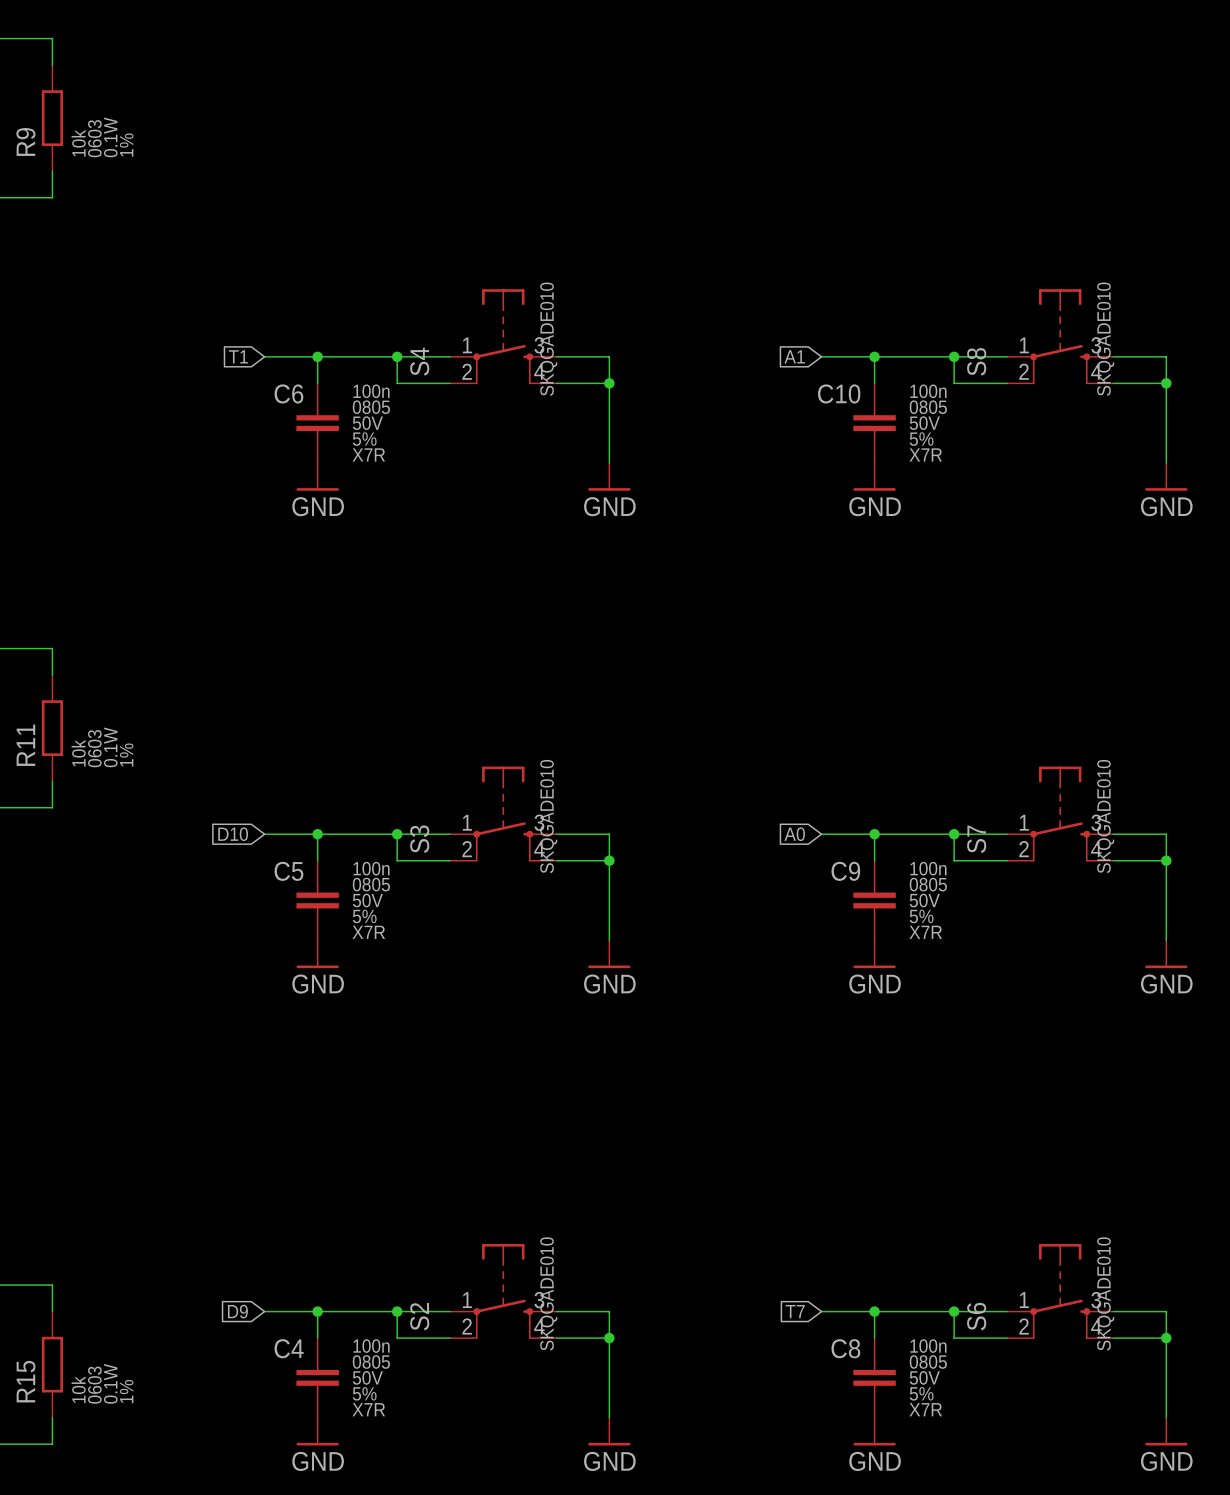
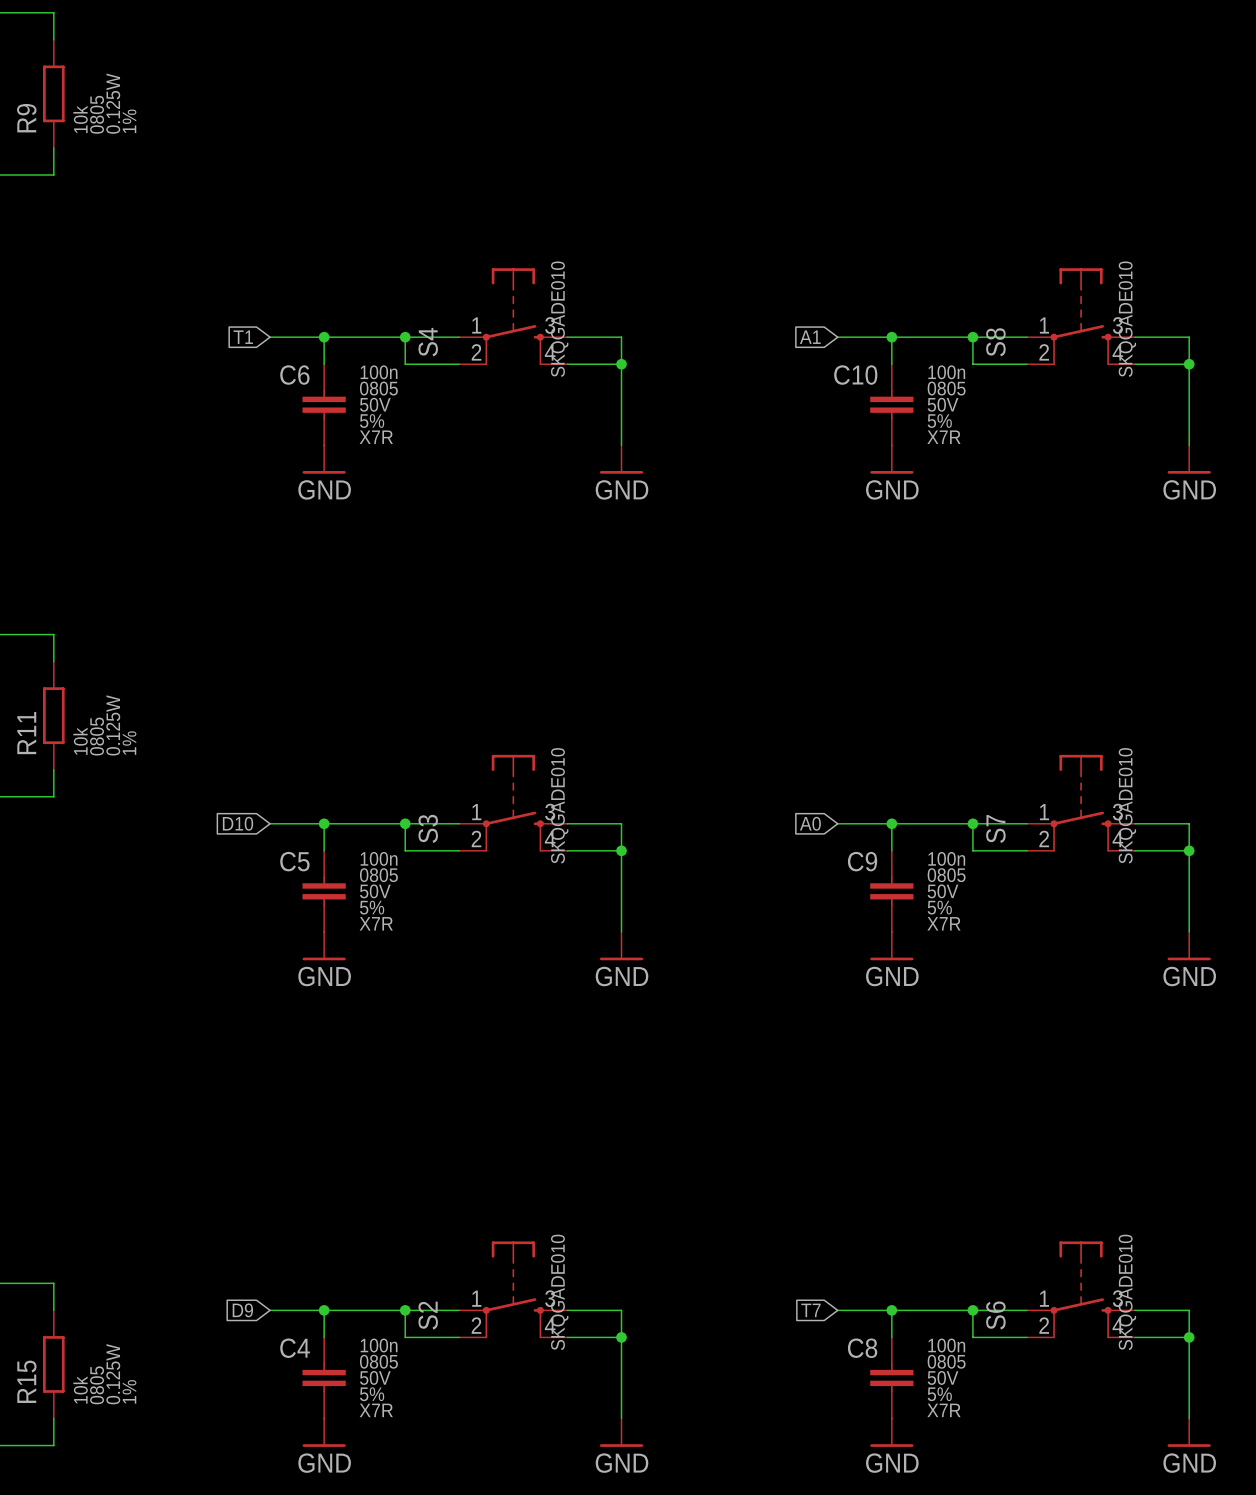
R9 text: 0.1W (110, 137) -> 0.125W (113, 103)
R9 text: 0603 (94, 138) -> 0805 (97, 114)
R11 text: 0.1W (110, 747) -> 0.125W (113, 725)
R11 text: 0603 (94, 748) -> 0805 (97, 736)
R15 text: 0.1W (110, 1383) -> 0.125W (113, 1374)
R15 text: 0603 (94, 1385) -> 0805 (97, 1385)

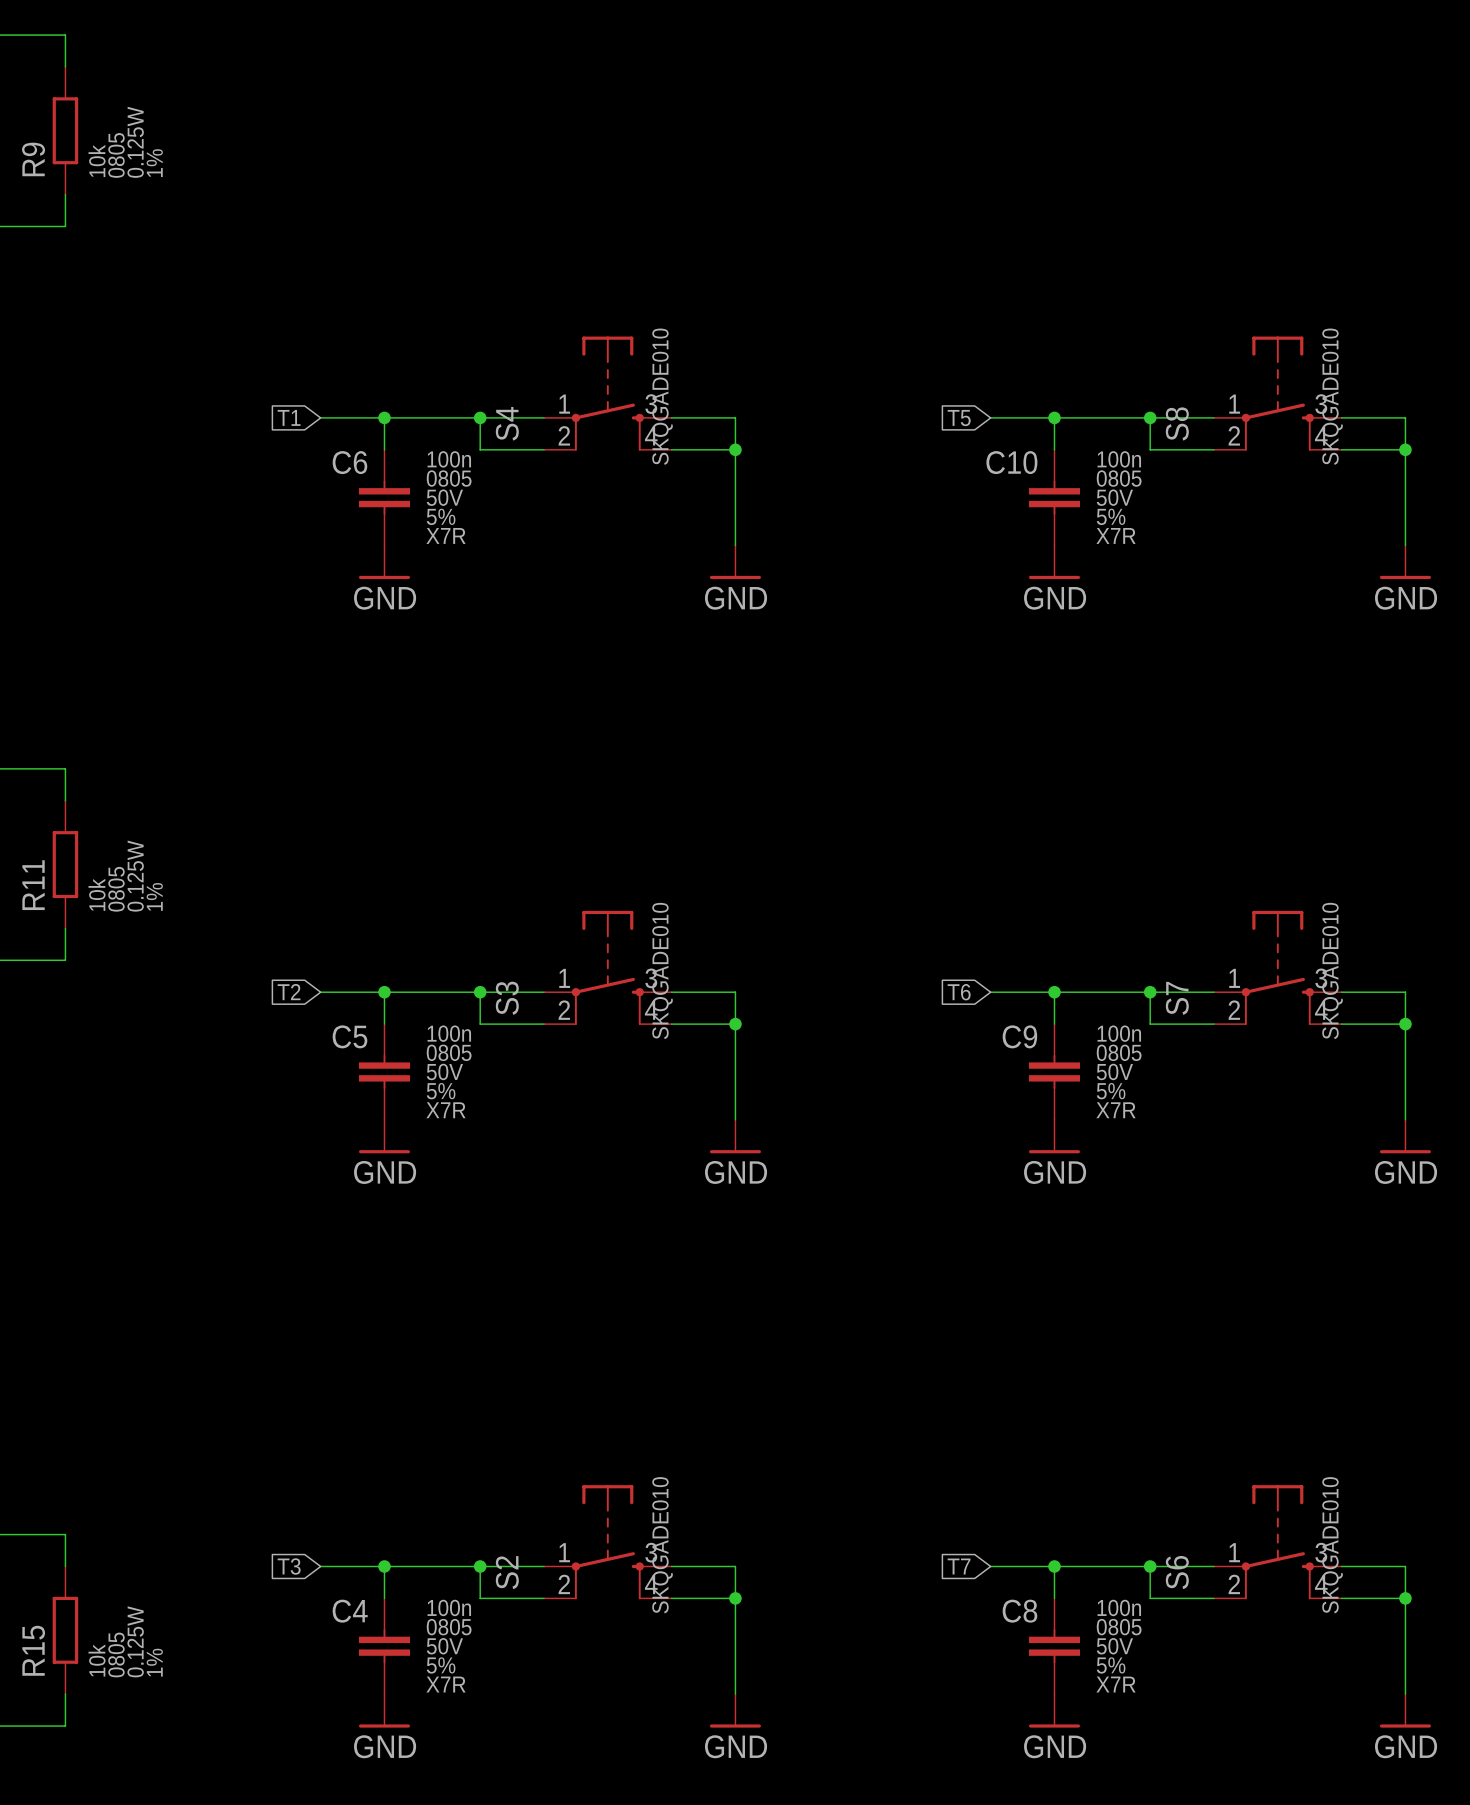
global label: A1 (810, 337) -> T5 (959, 418)
global label: D10 (238, 823) -> T2 (289, 992)
global label: A0 (810, 823) -> T6 (959, 992)
global label: D9 (242, 1310) -> T3 (289, 1566)

